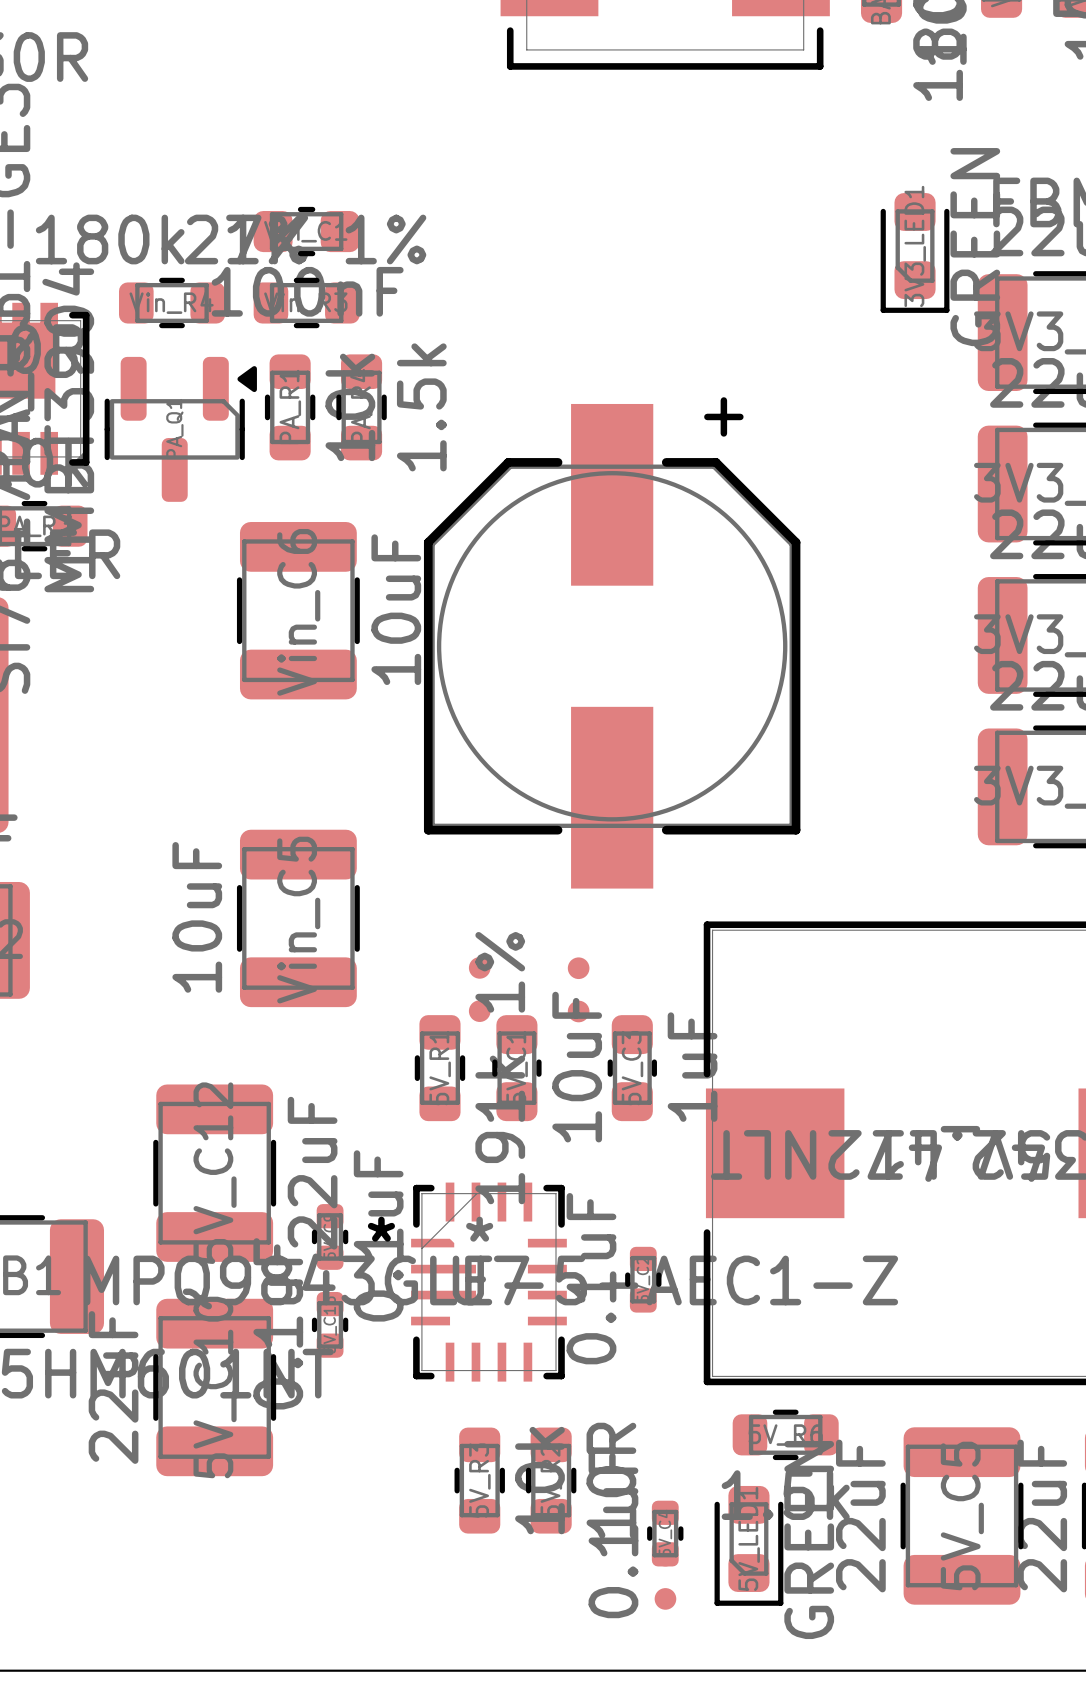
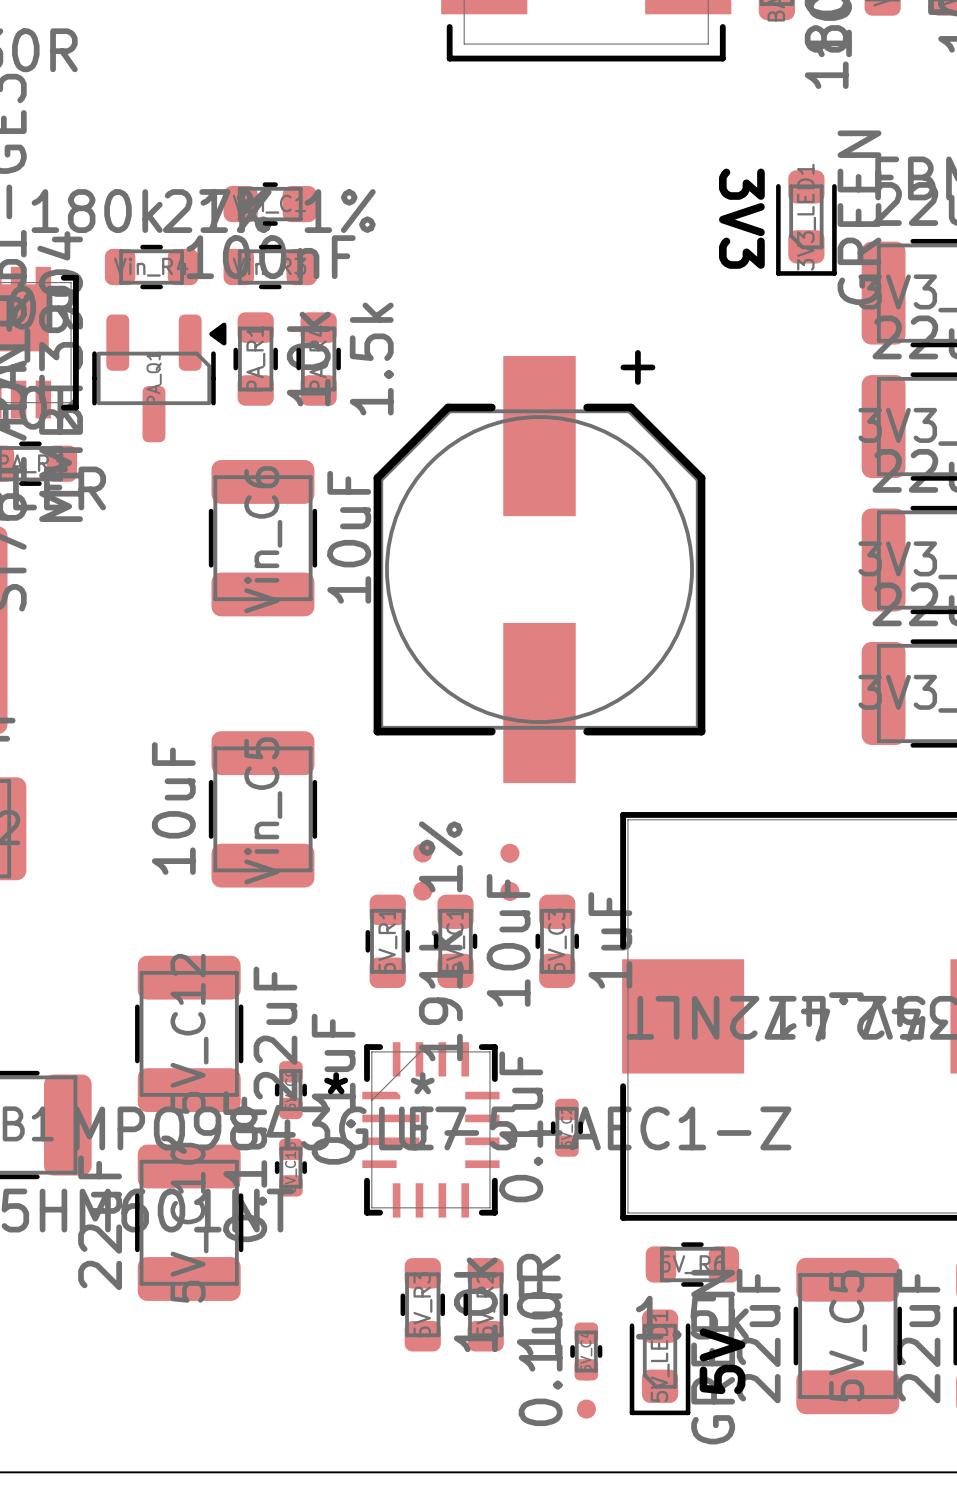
text: none -> 3V3 (741, 218)
text: none -> 5V (722, 1361)

